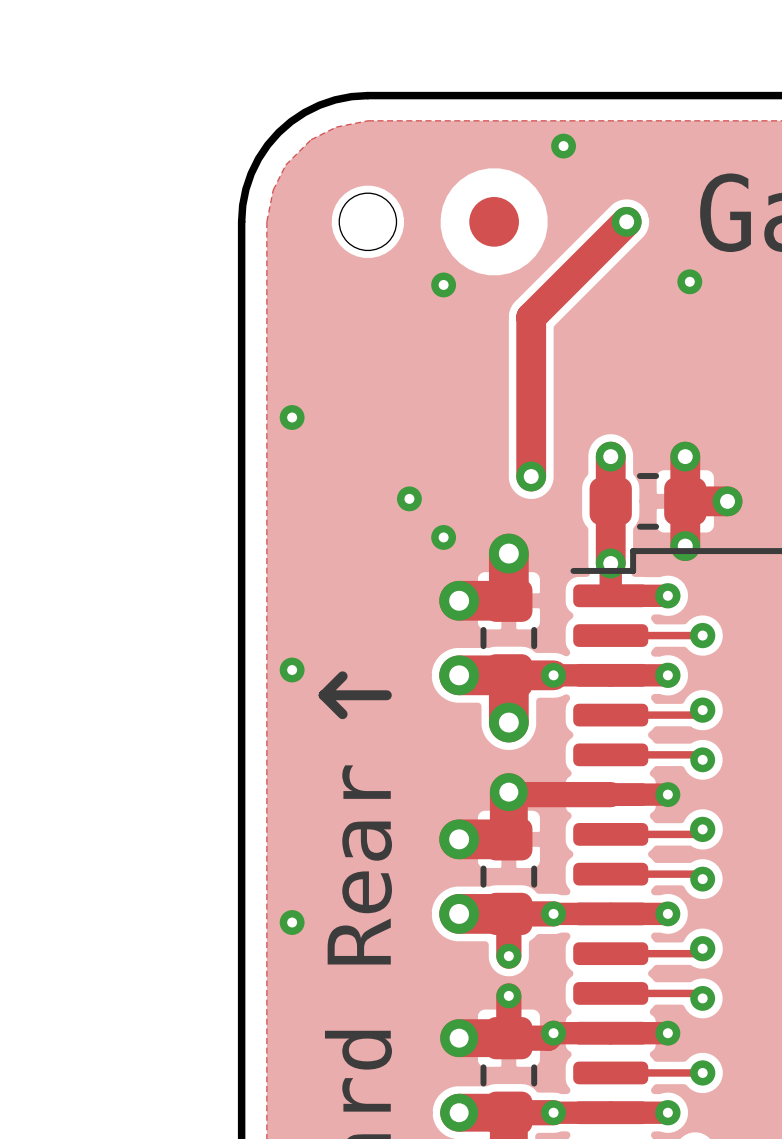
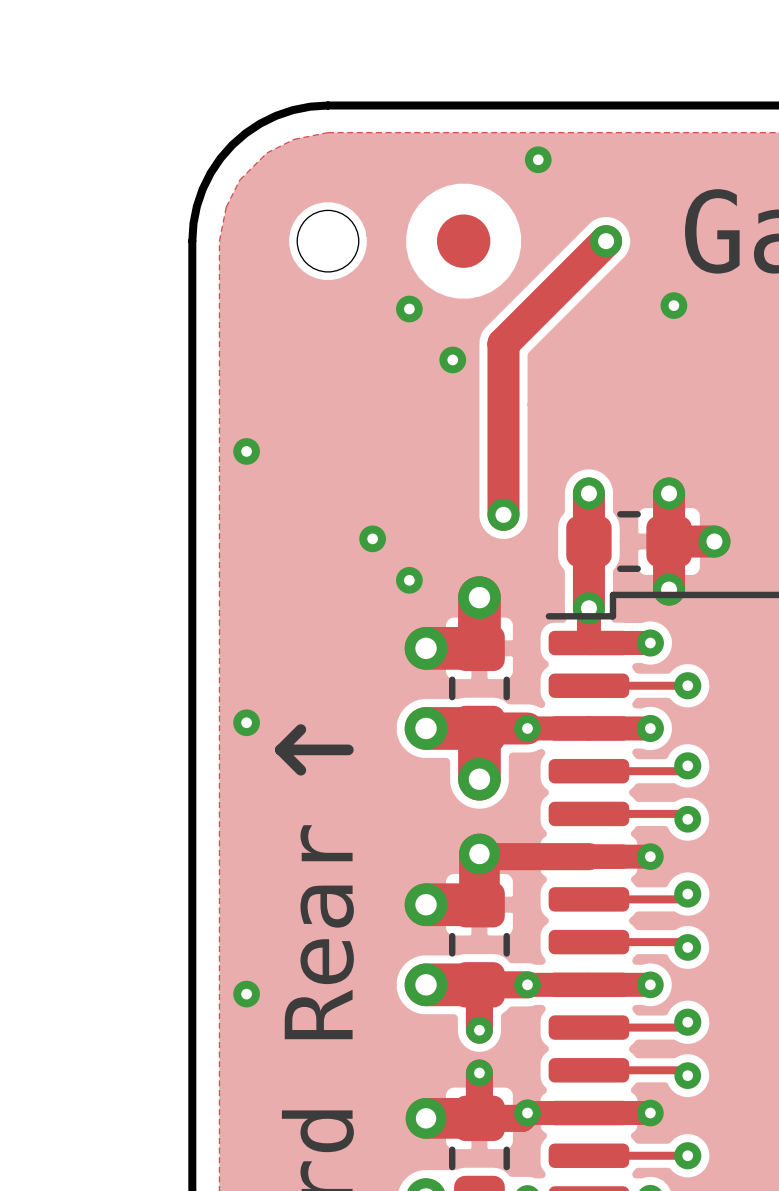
via: none -> (452, 359)

